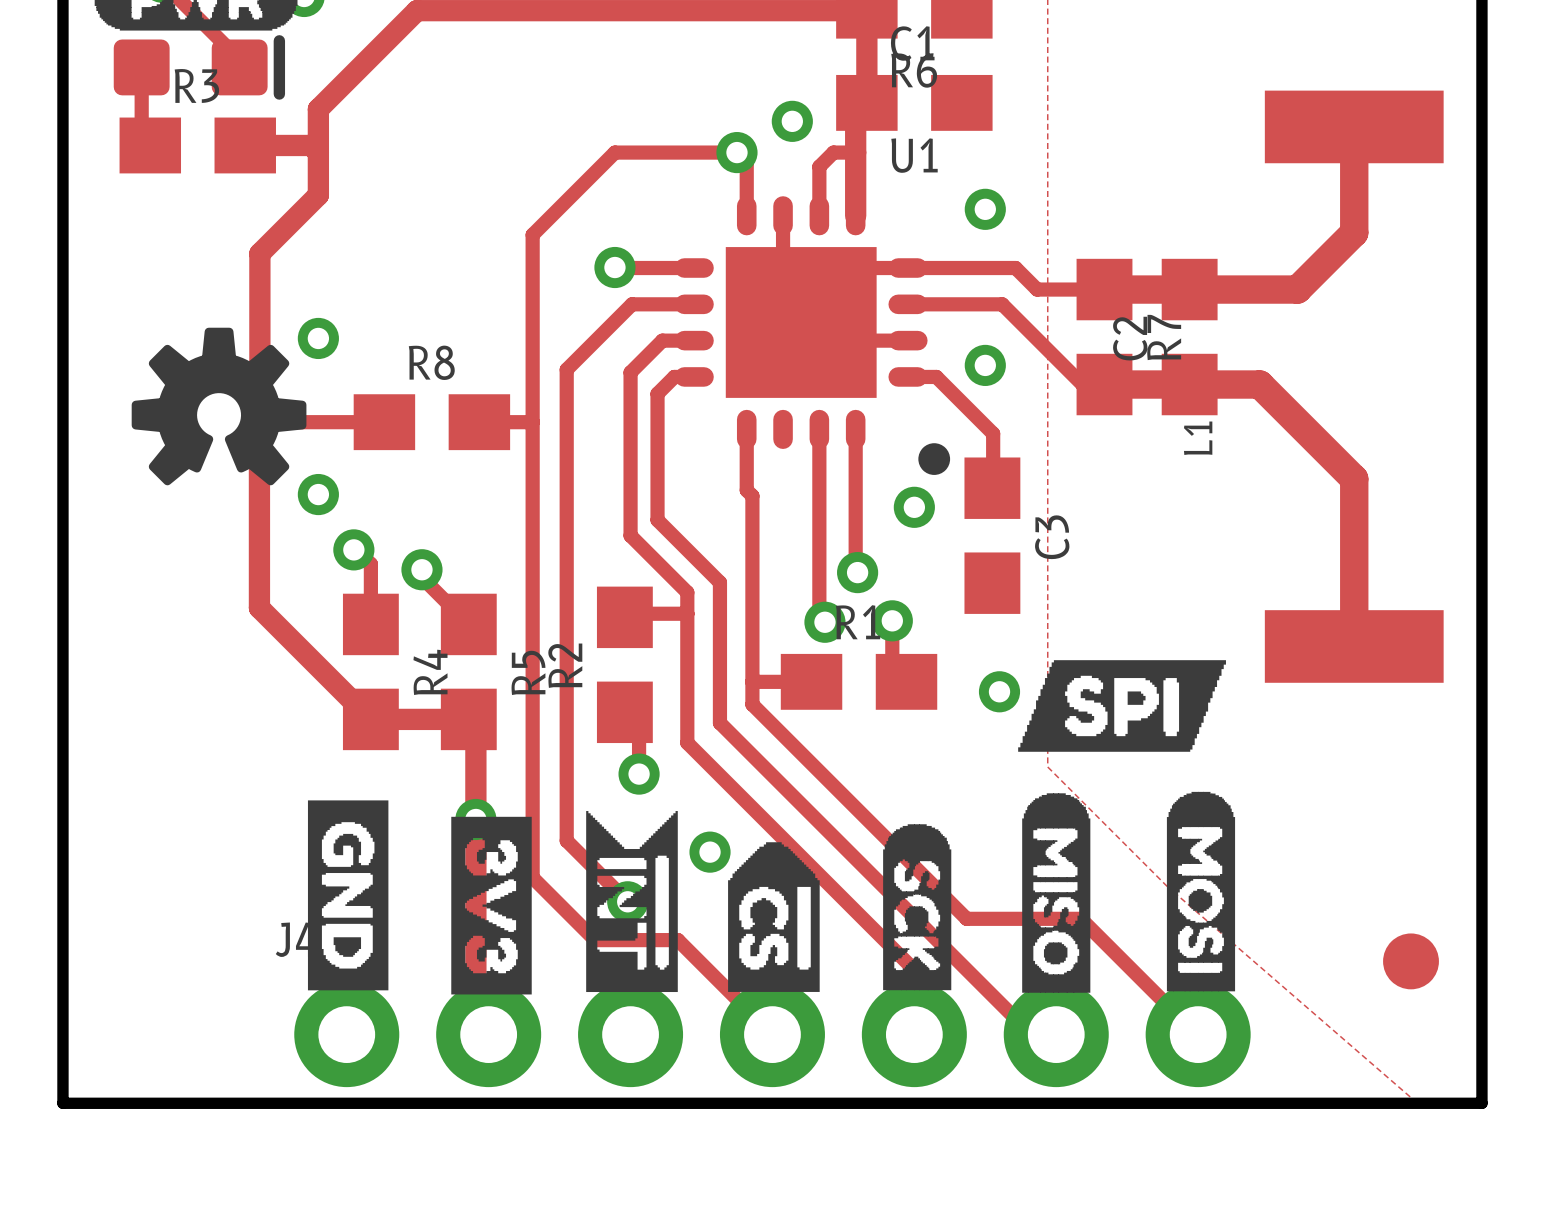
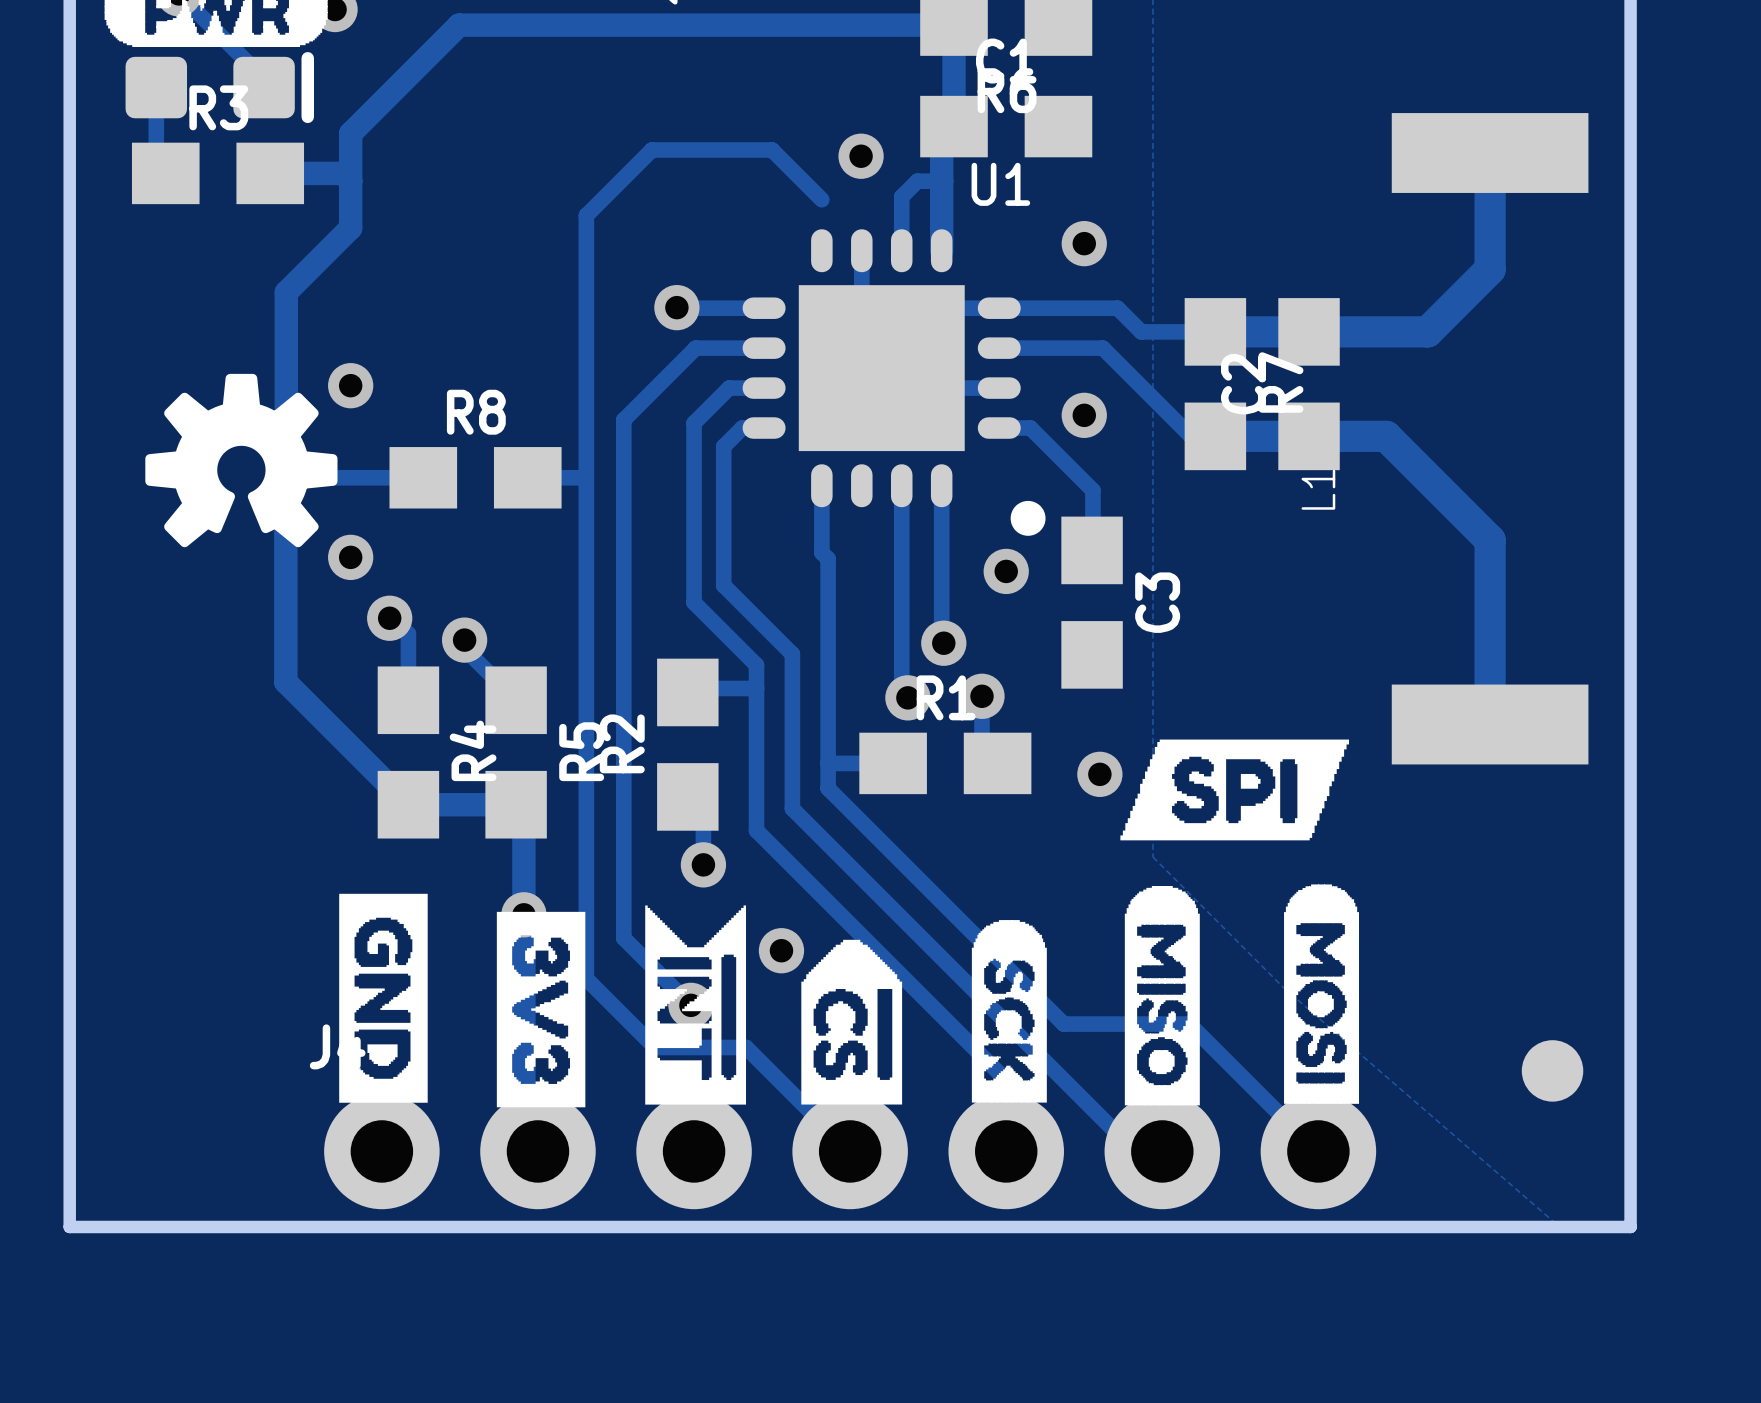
via position: (792, 121) -> (861, 156)
via: (736, 152) -> none
track: (746, 215) (746, 162) (736, 152) (614, 152) (532, 234) -> (821, 199) (772, 149) (651, 149) (586, 215) (586, 271)

